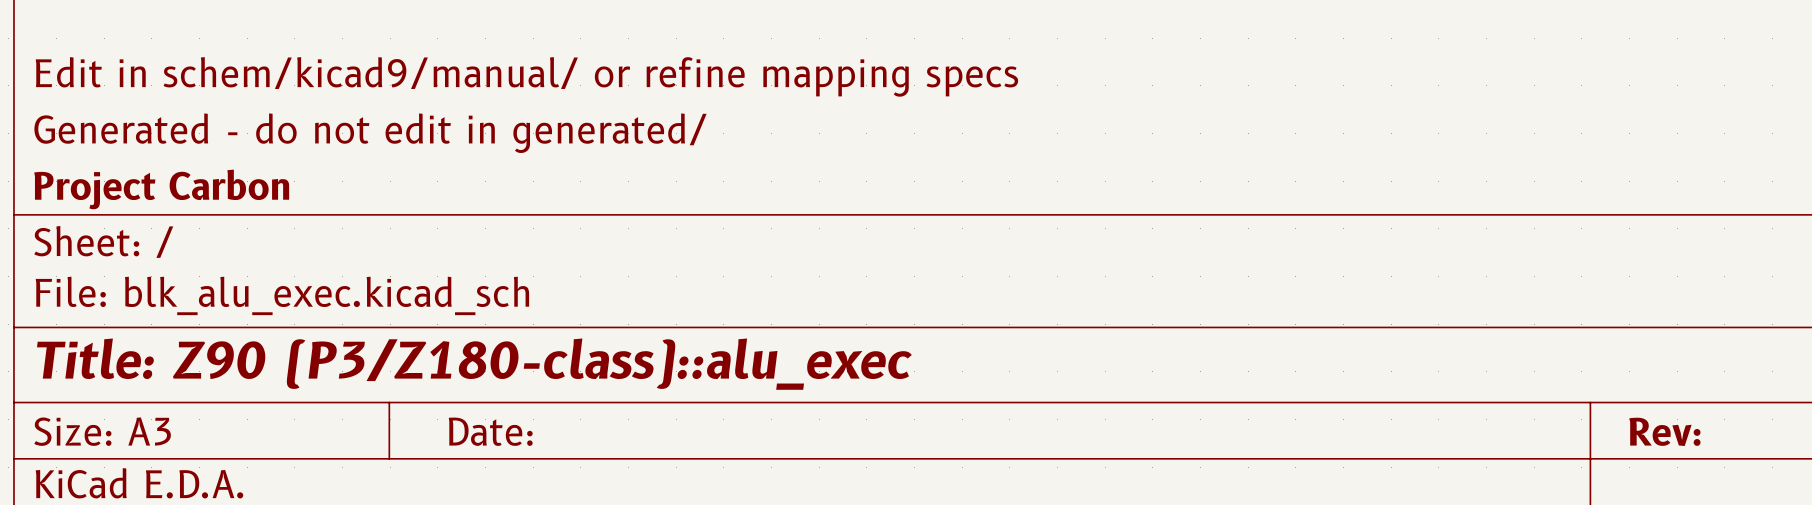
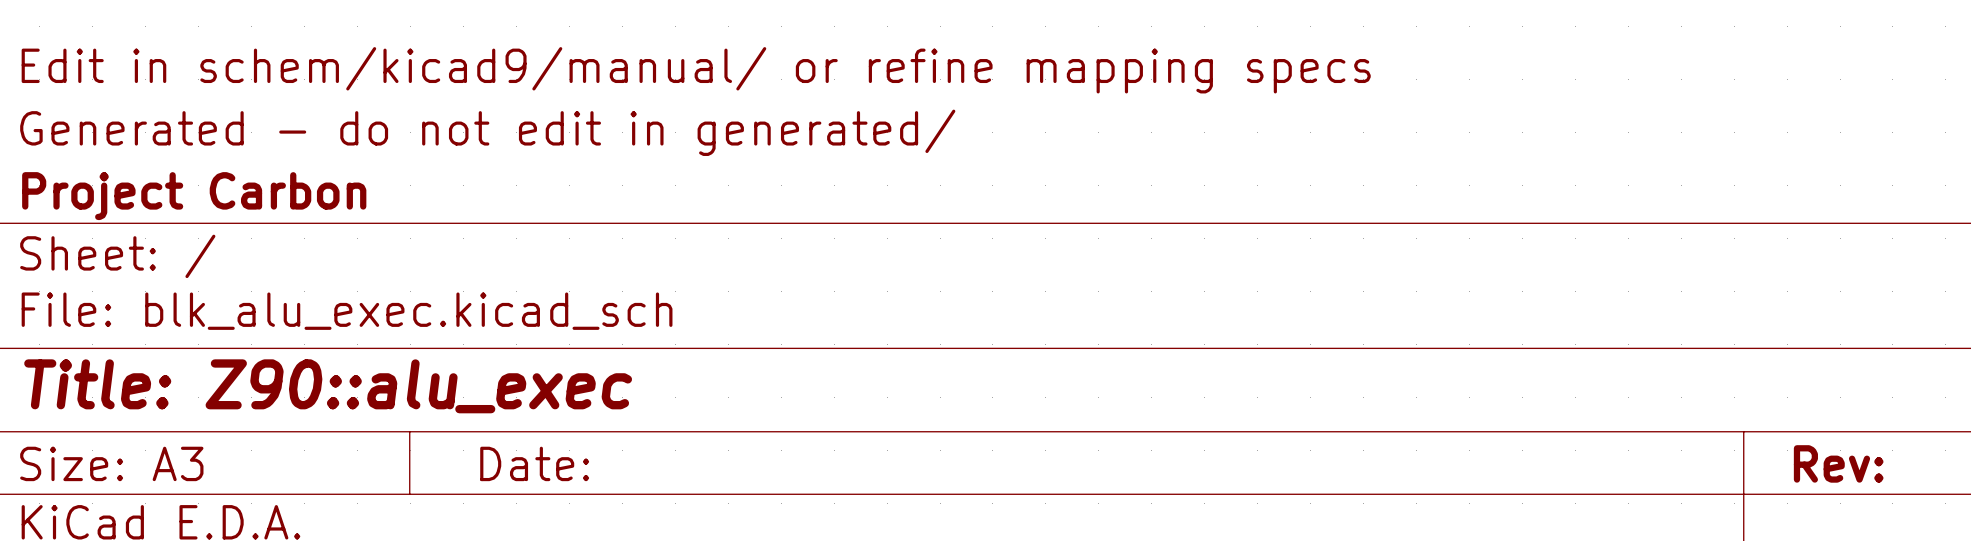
title block: Title: Z90 (P3/Z180-class)::alu_exec (474, 364) -> Title: Z90::alu_exec (328, 386)

